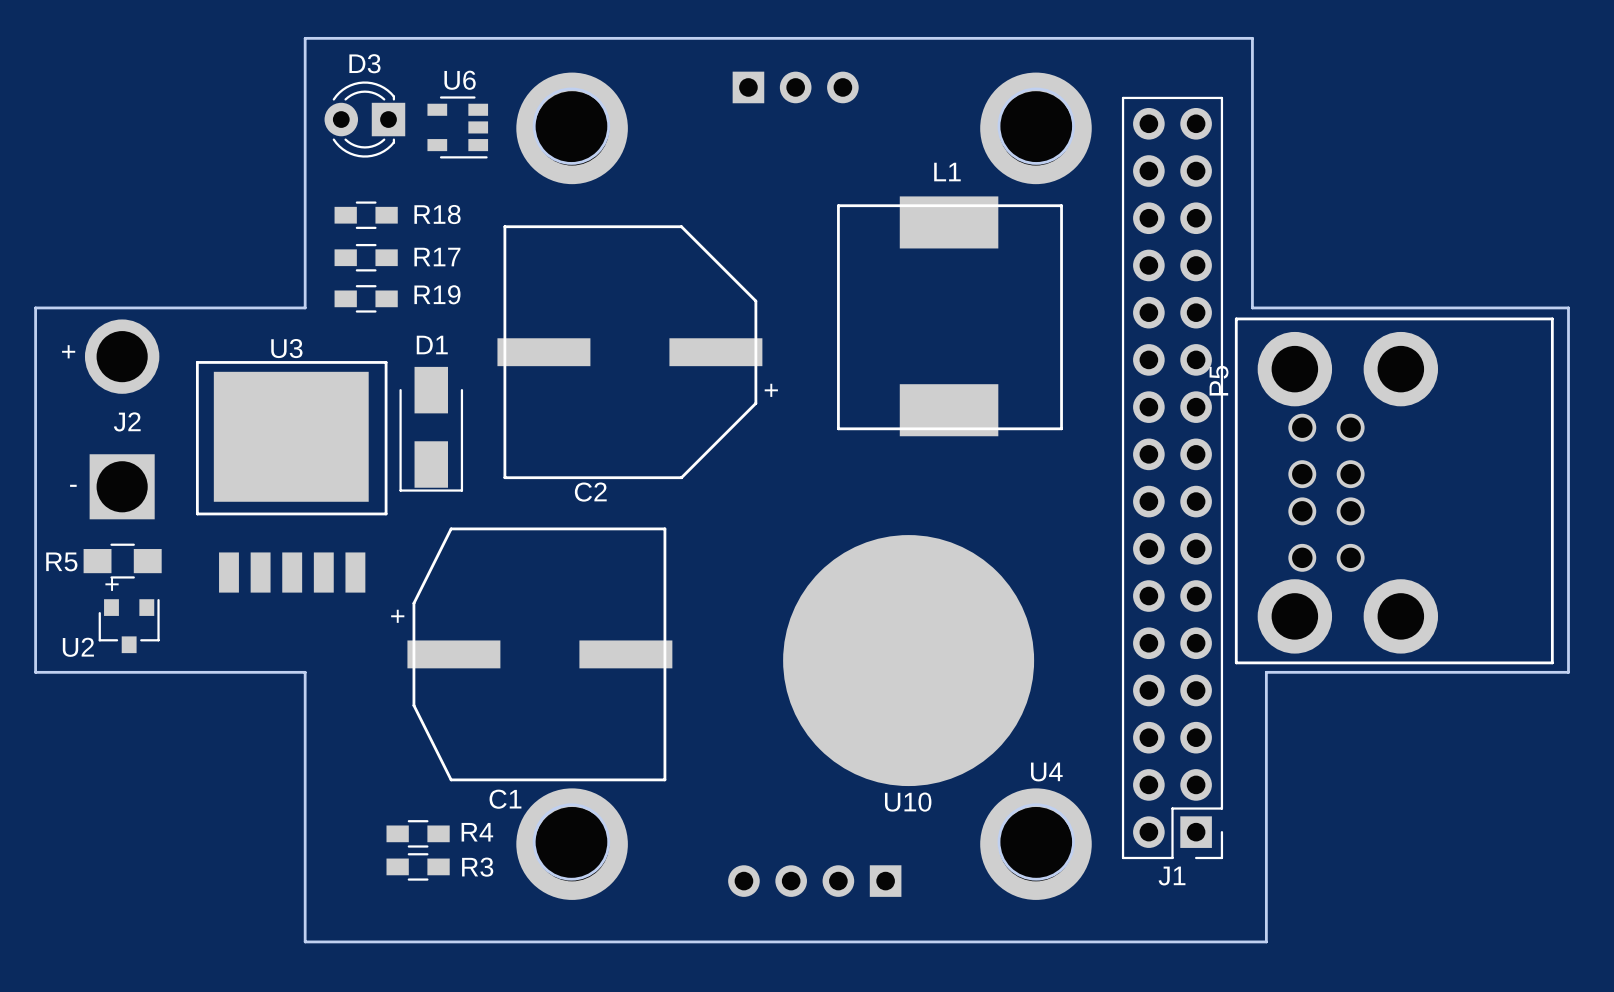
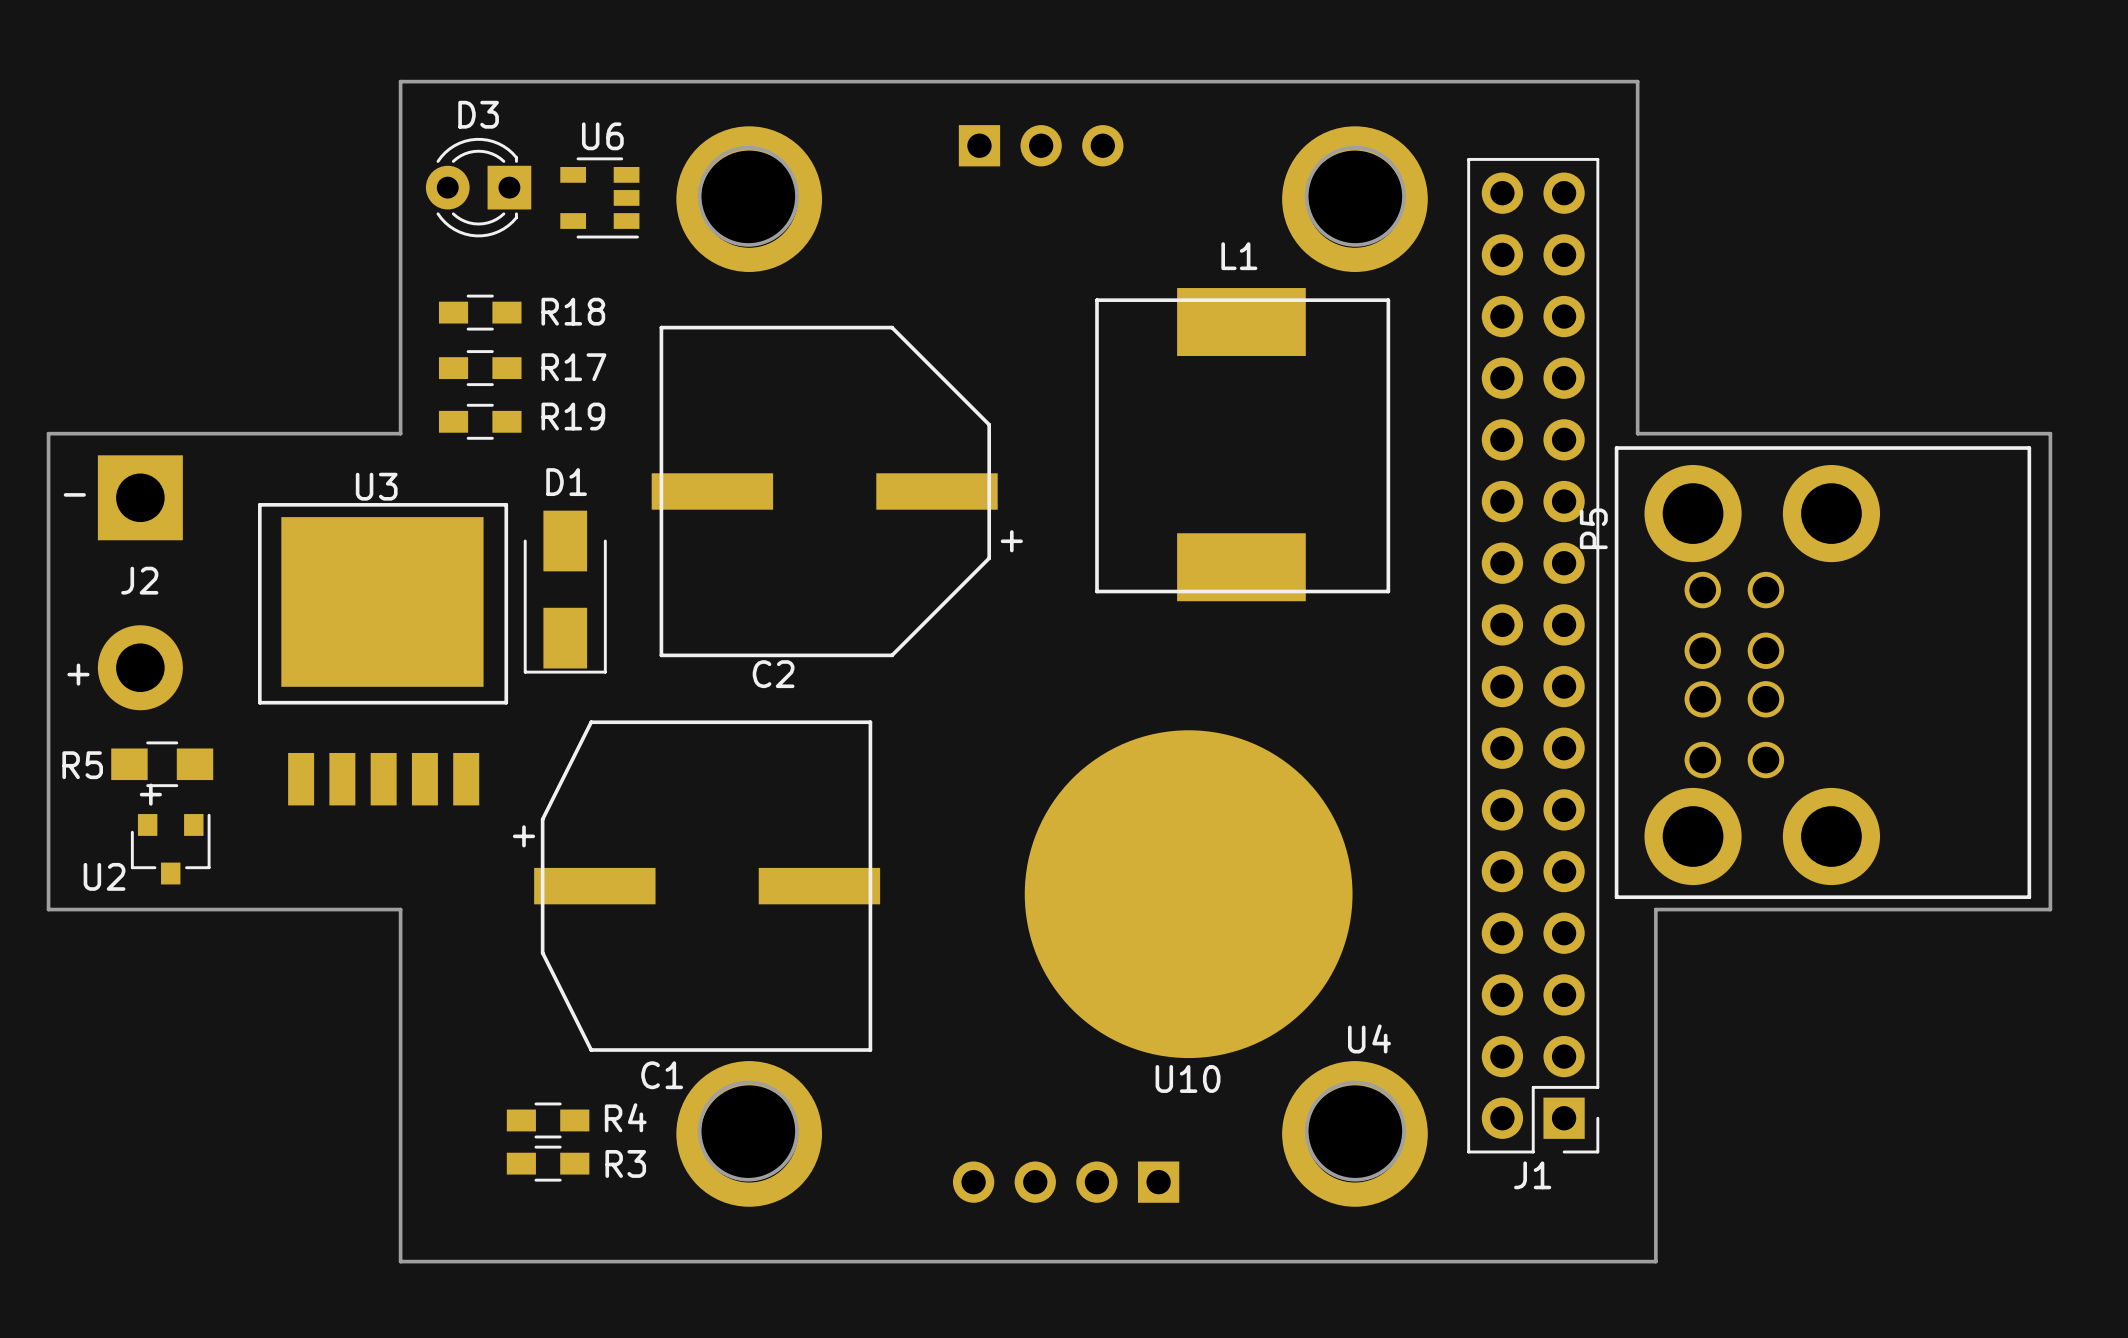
J2 footprint: [84, 319, 160, 520] -> [97, 455, 183, 711]

